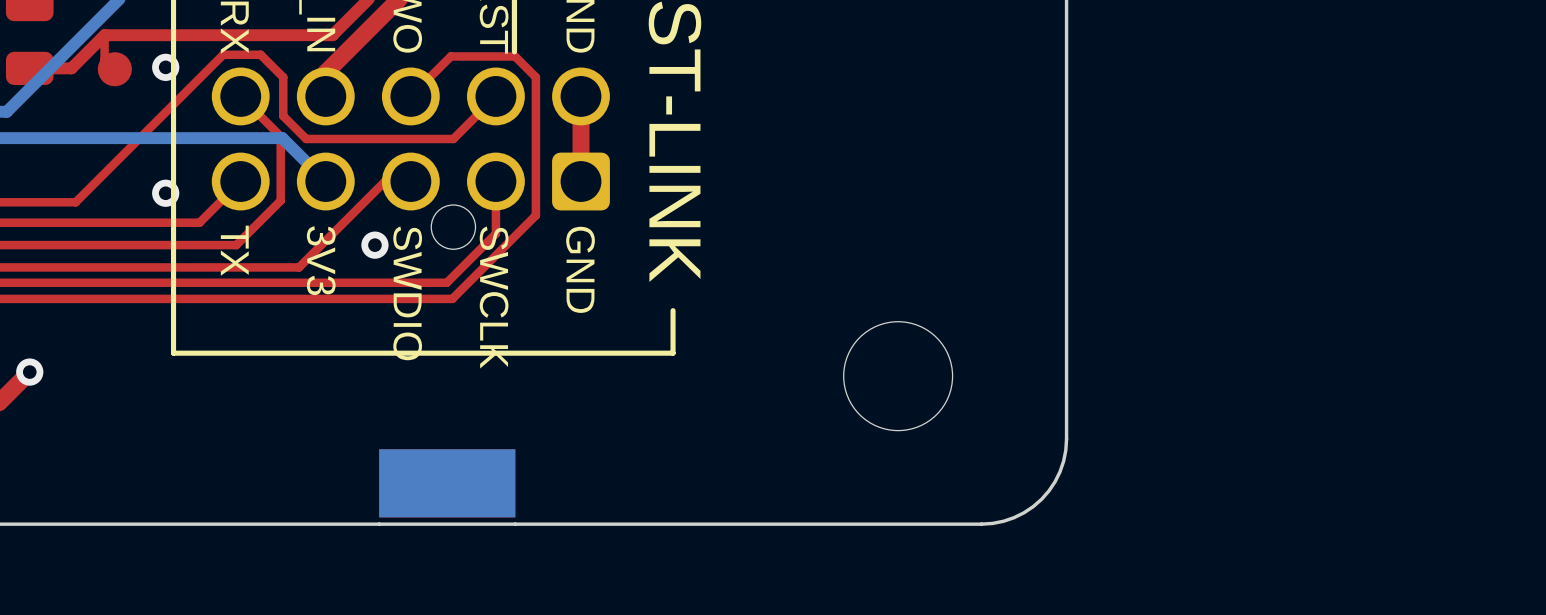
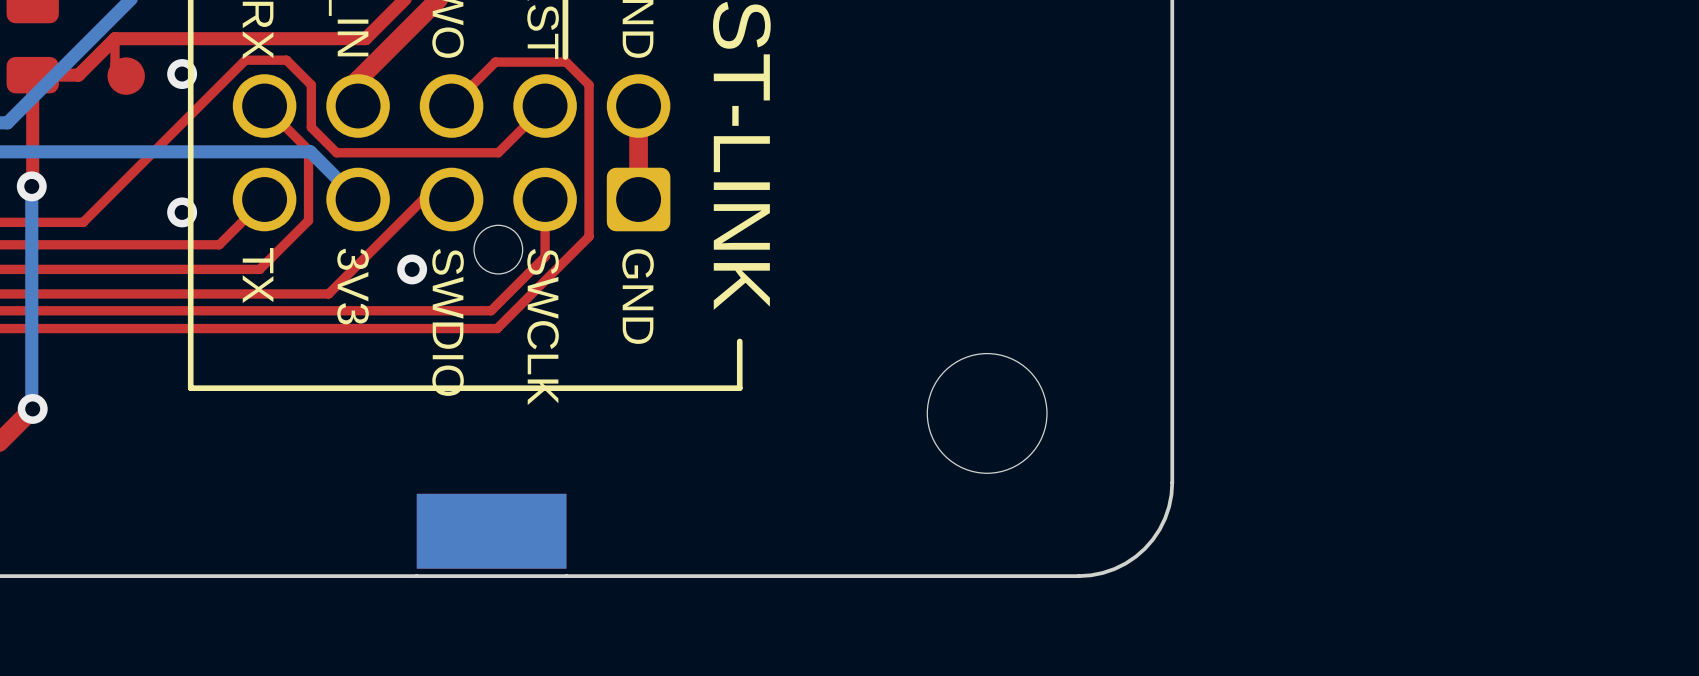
top track: none -> (32, 75) (31, 186)
bottom track: none -> (31, 186) (31, 408)
via: none -> (31, 186)

